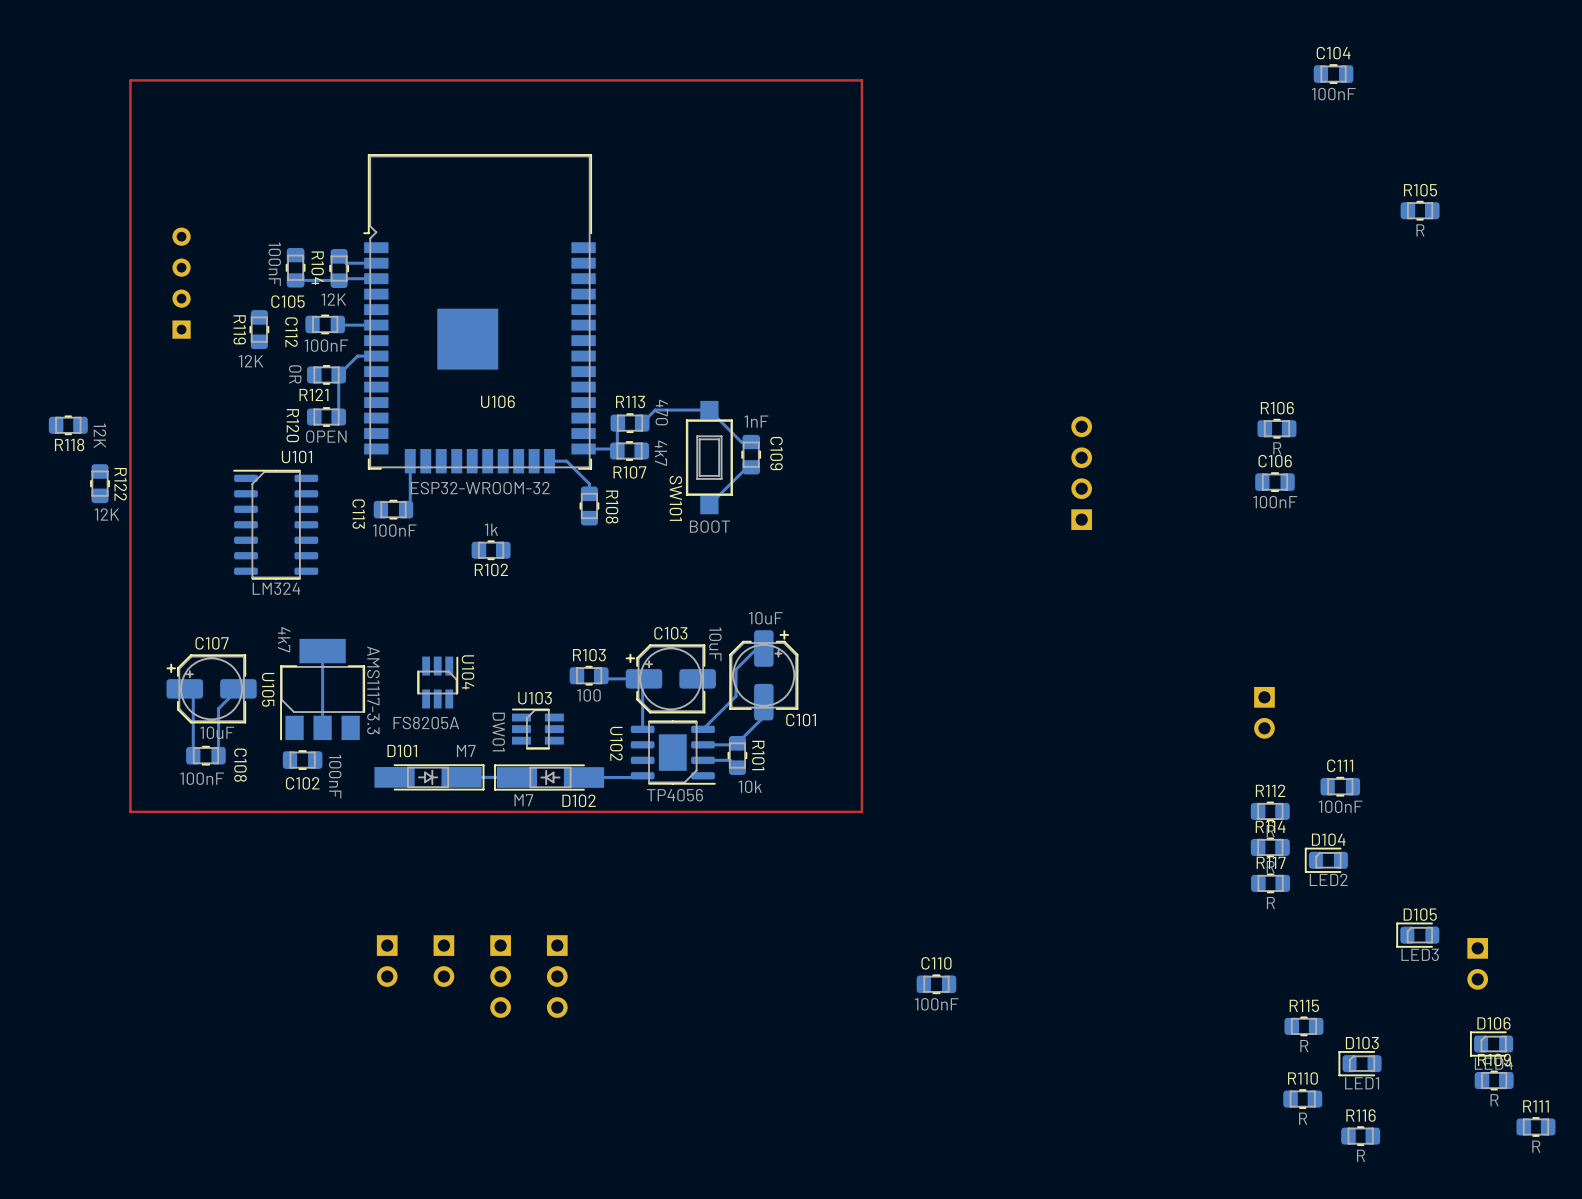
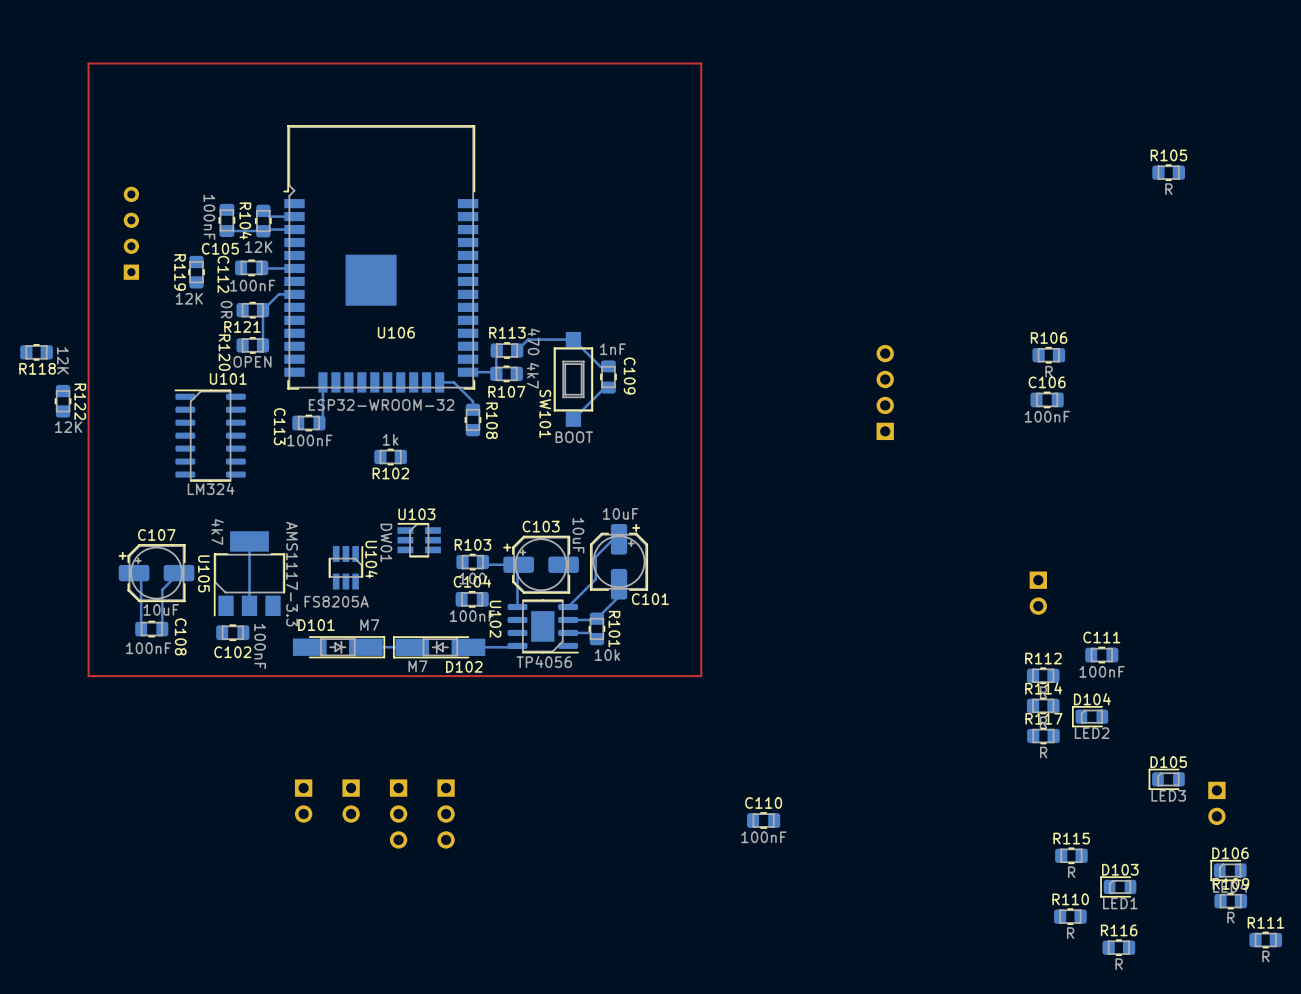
C104 position: (1333, 74) -> (472, 599)
U103 position: (537, 729) -> (419, 540)

